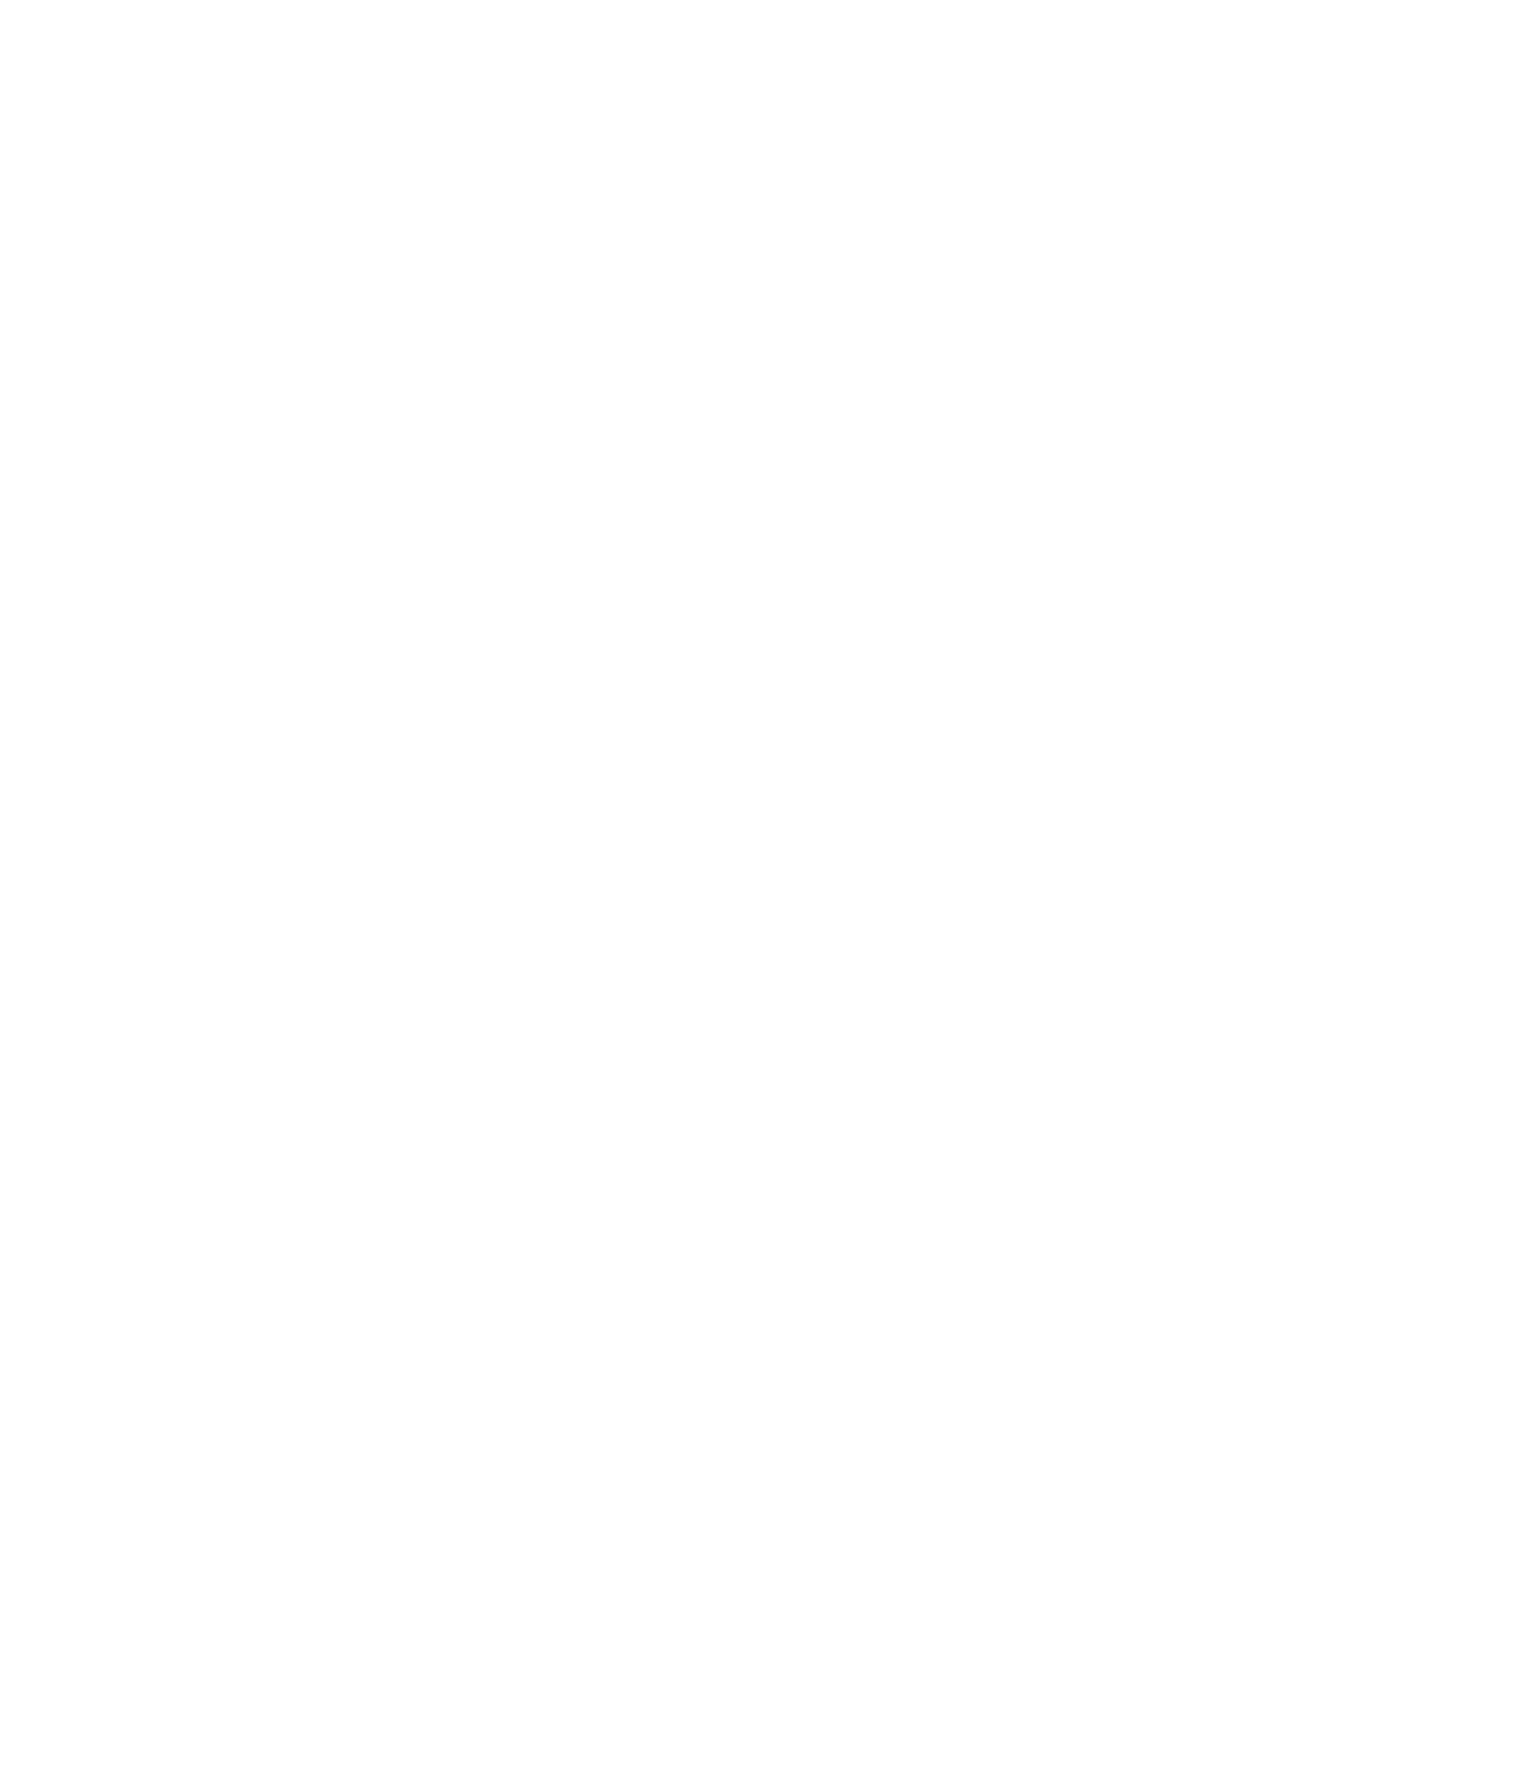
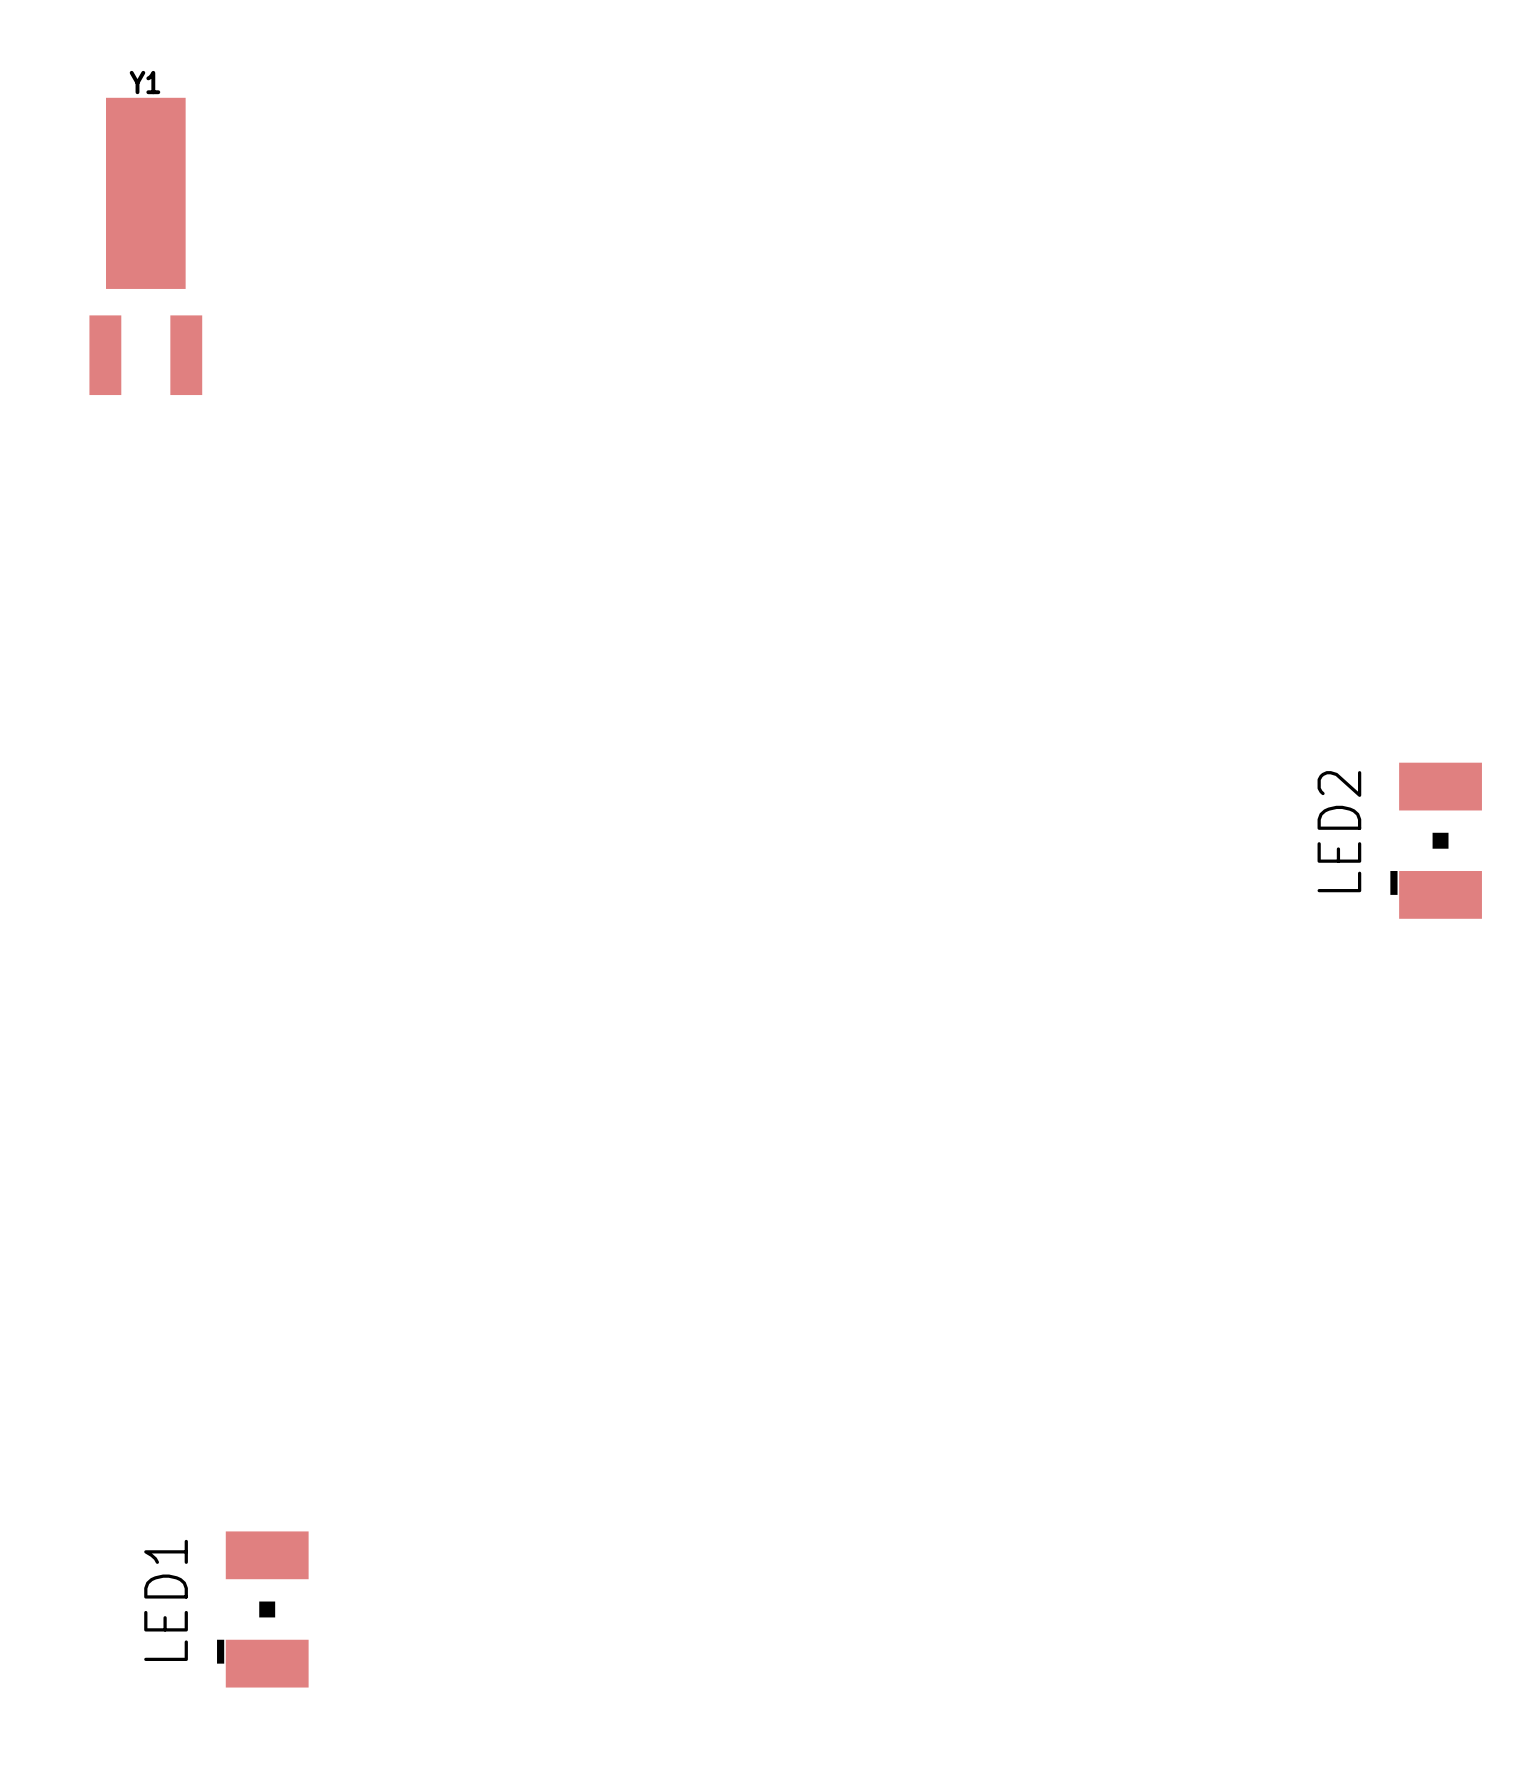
Y1: none -> (145, 246)
LED2: none -> (1436, 840)
LED1: none -> (262, 1609)

